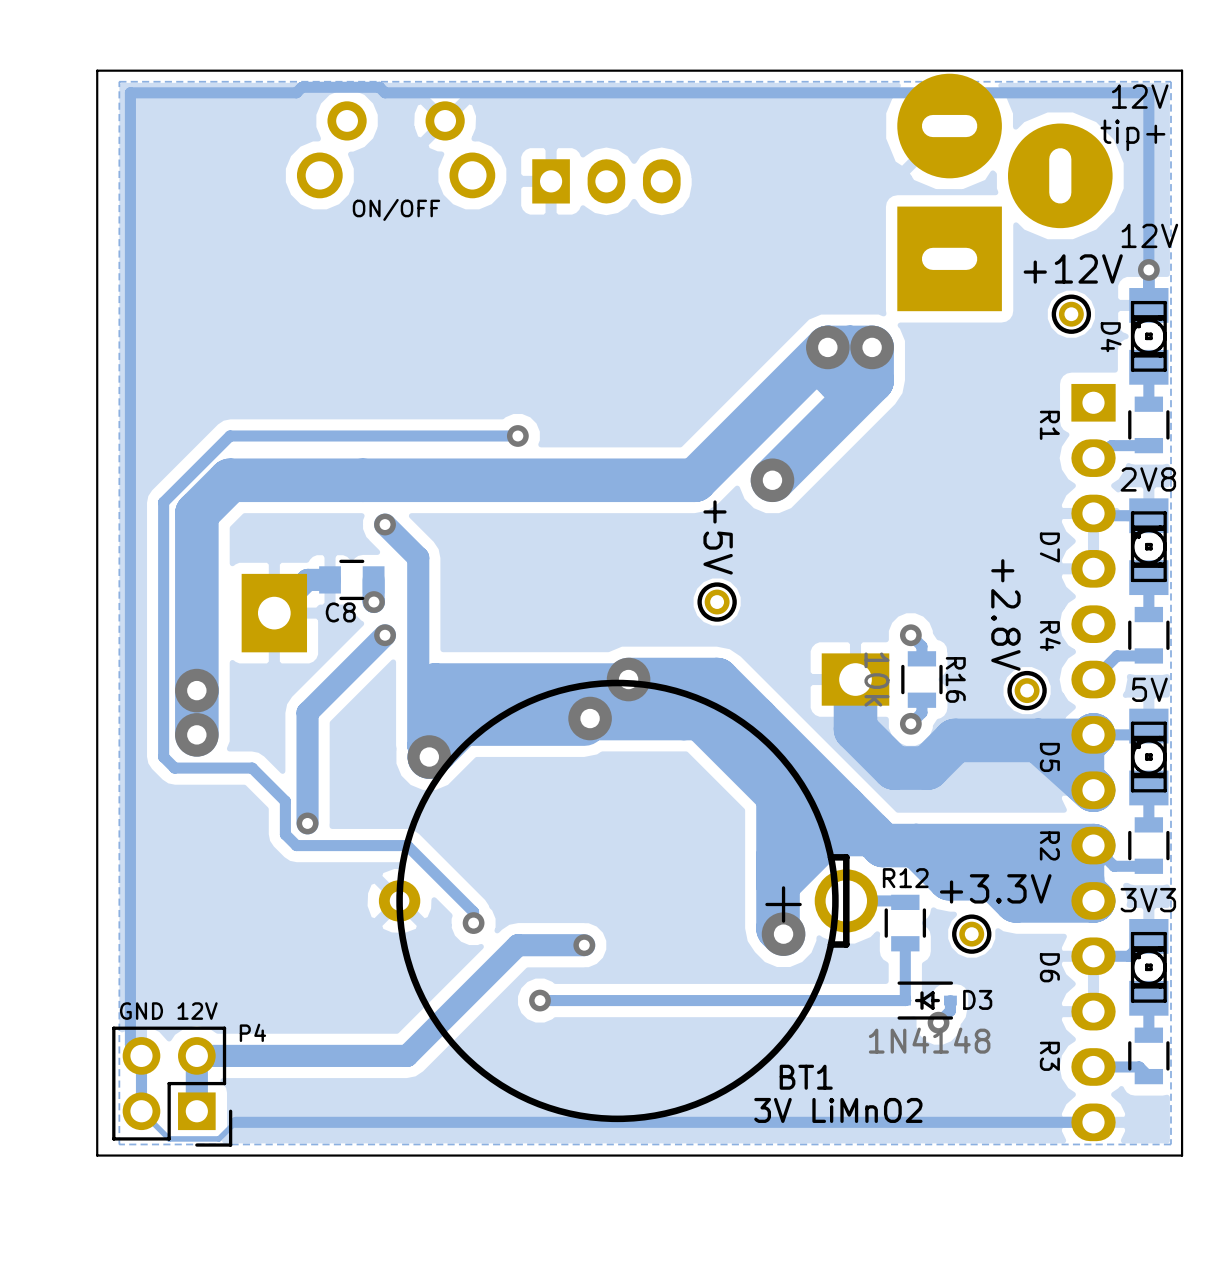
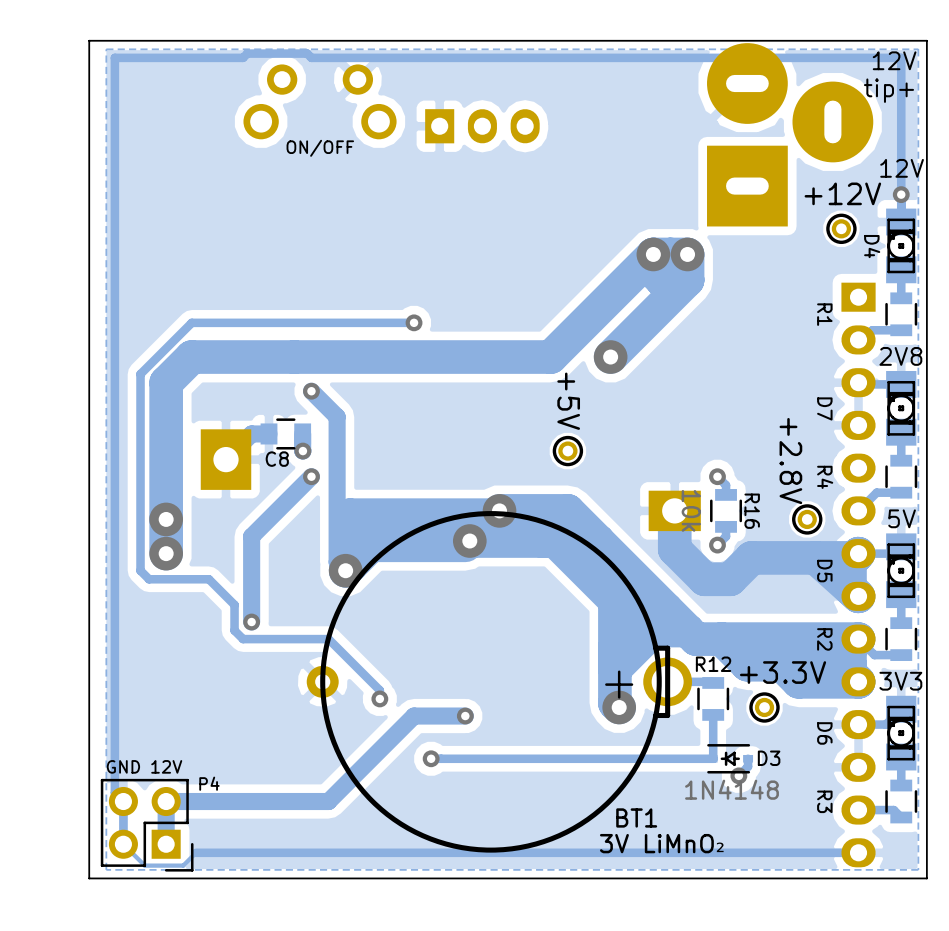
BT1 value: 3V LiMnO2 (838, 1110) -> 3V LiMnO₂ (662, 843)

